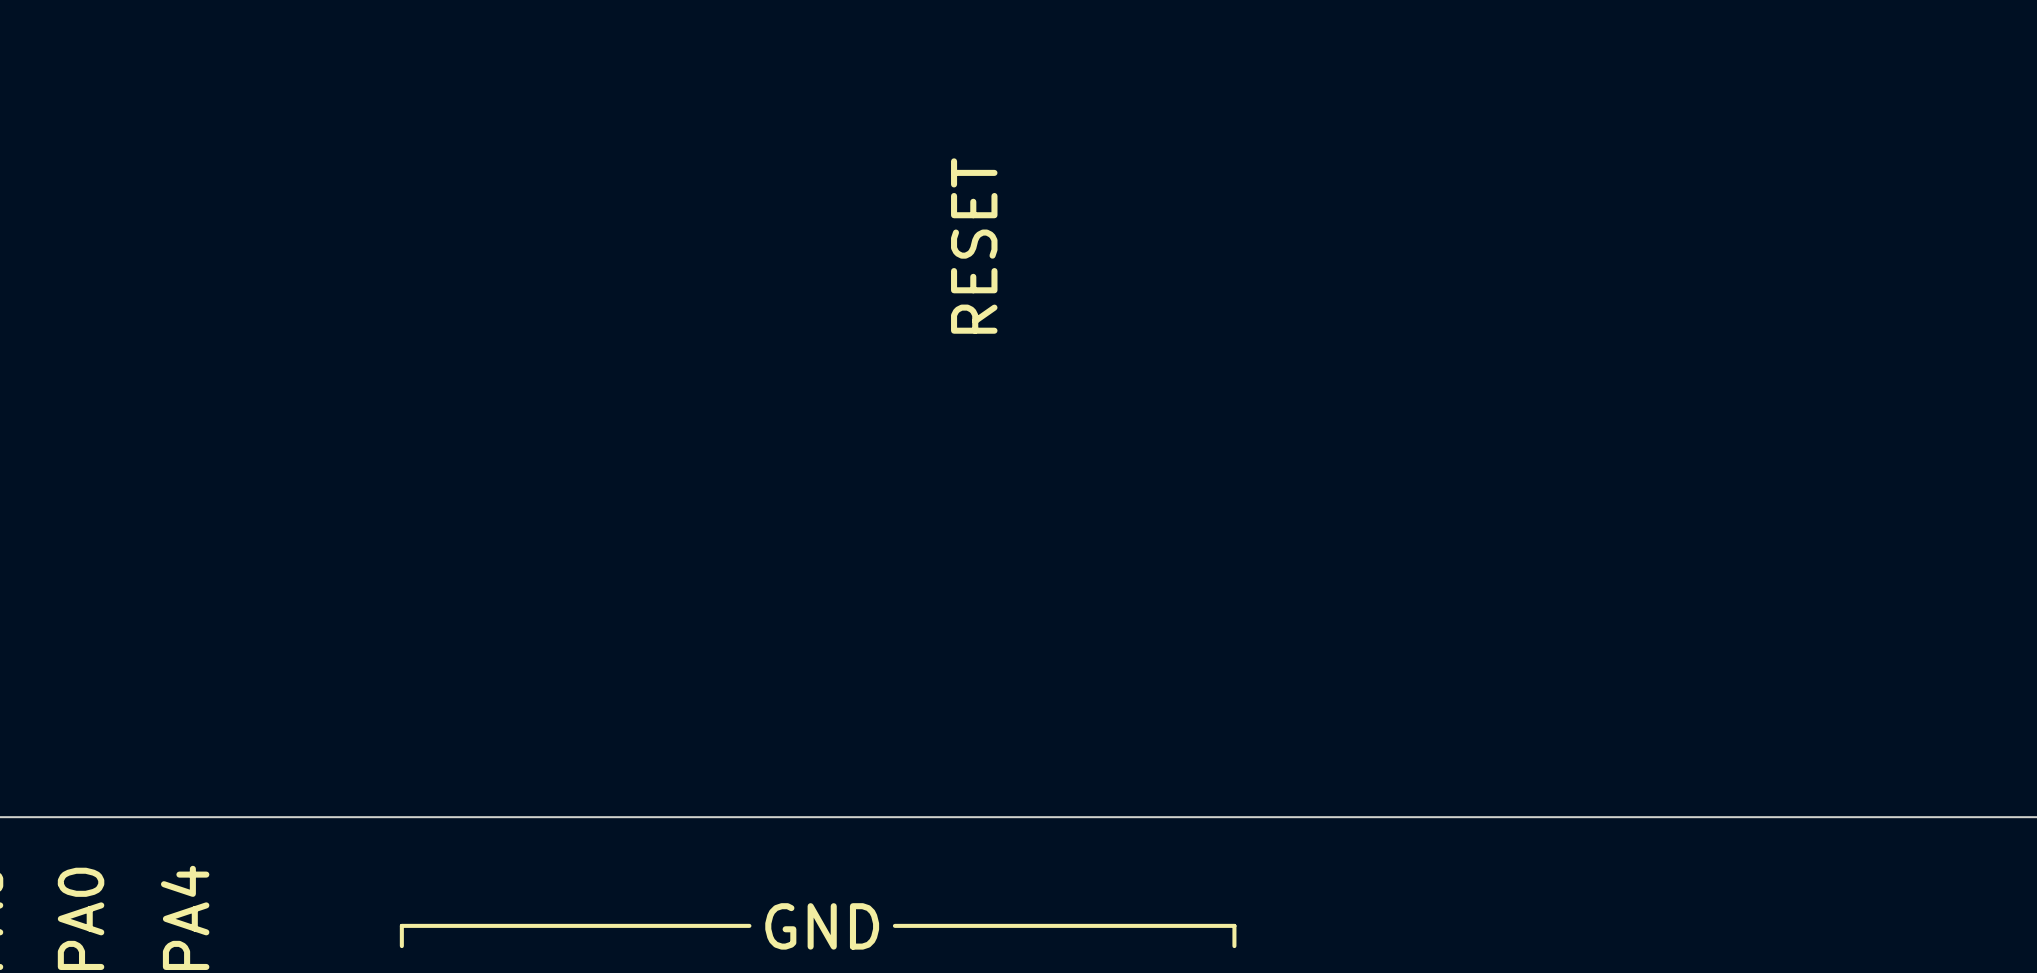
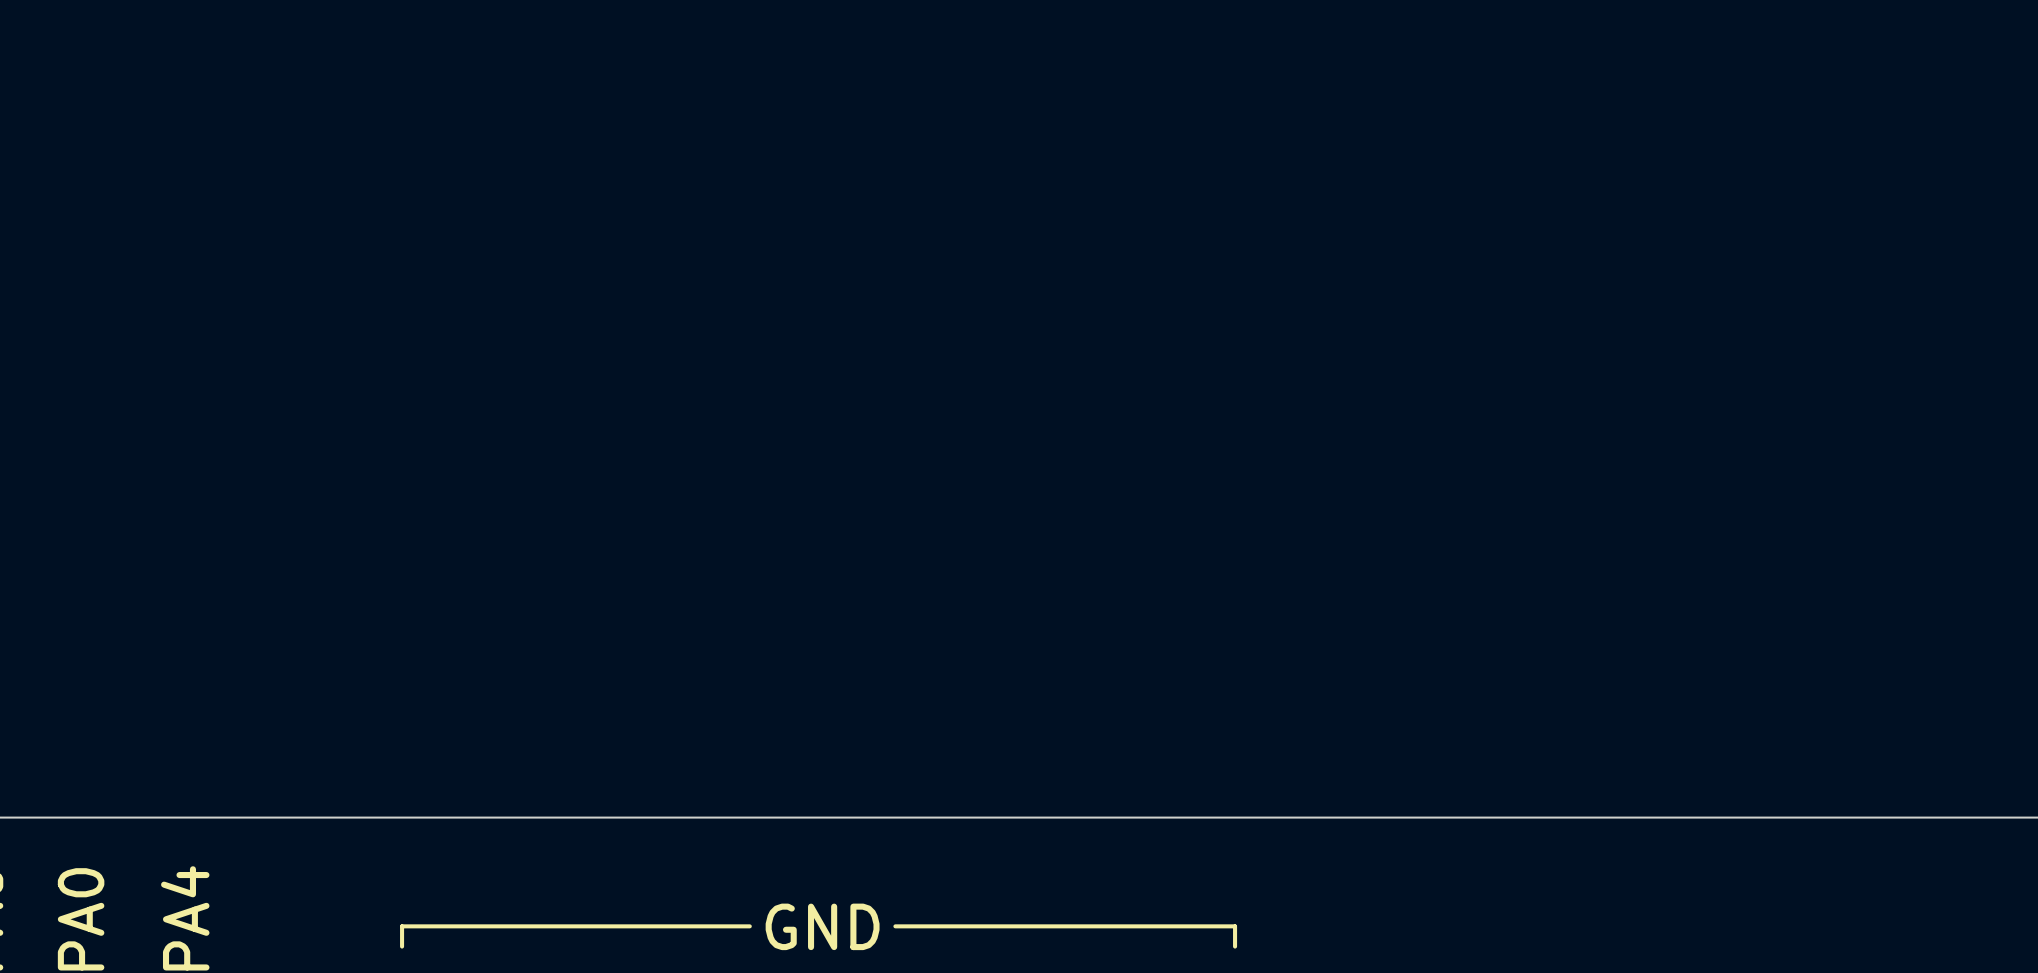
text: RESET (974, 246) -> none

